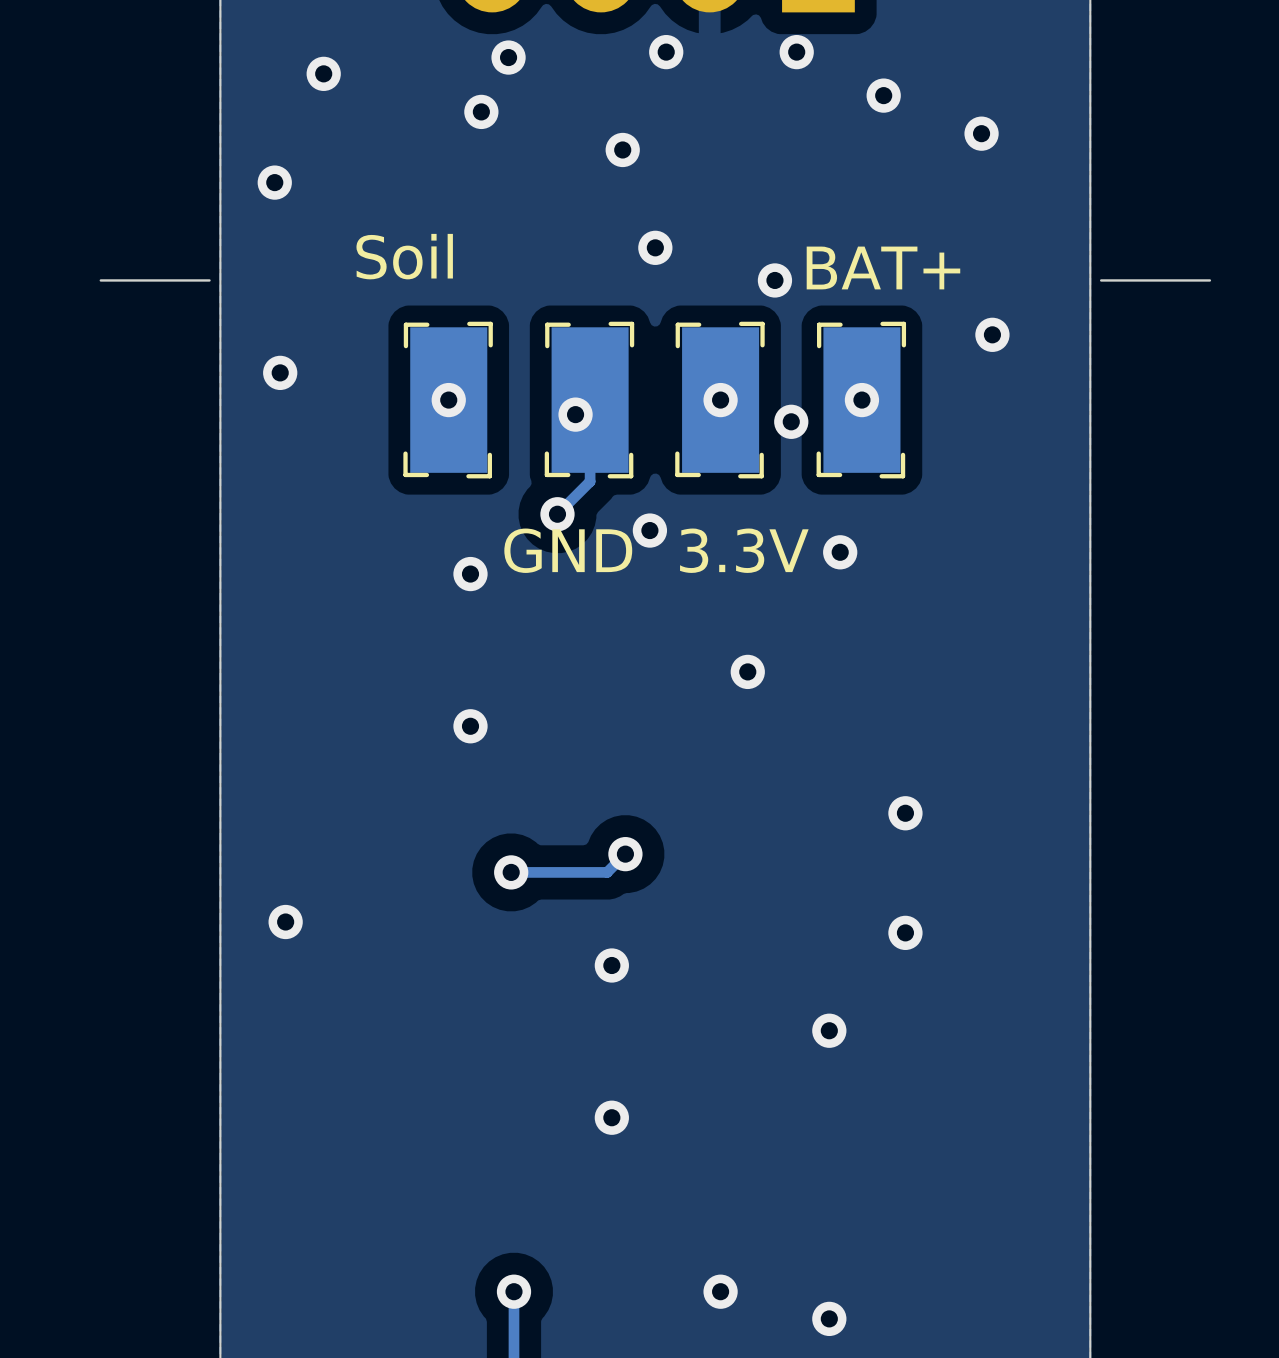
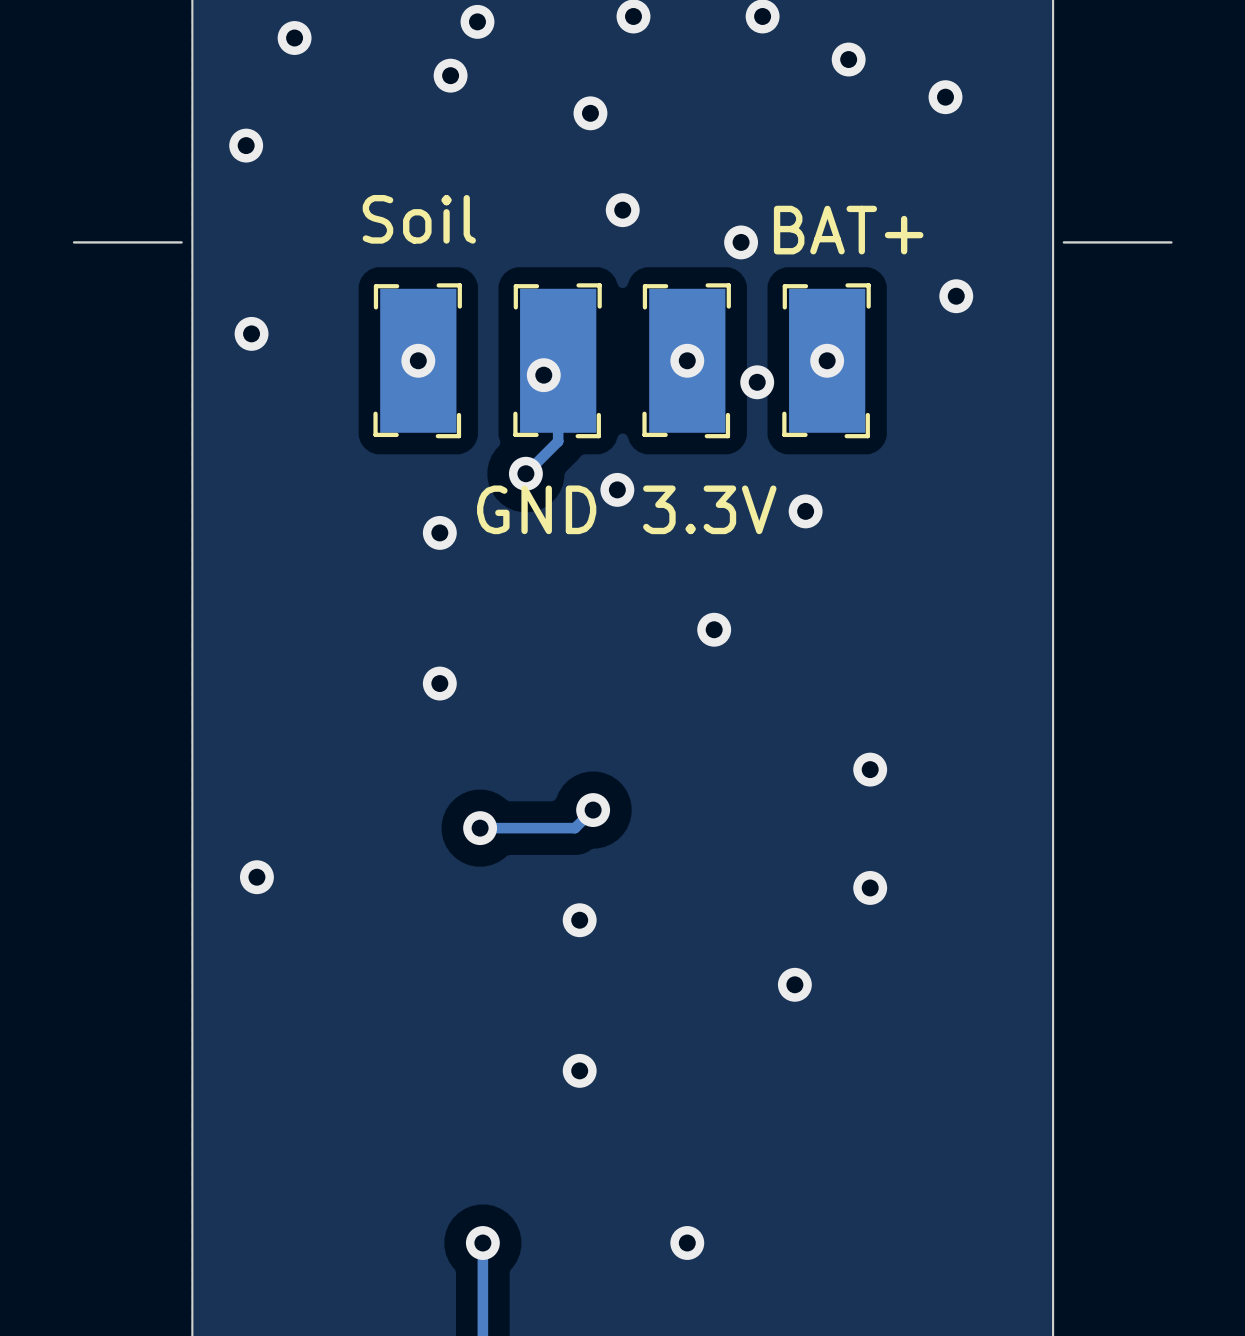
text position: Soil (404, 256) -> Soil (419, 219)
via: (829, 1318) -> none

